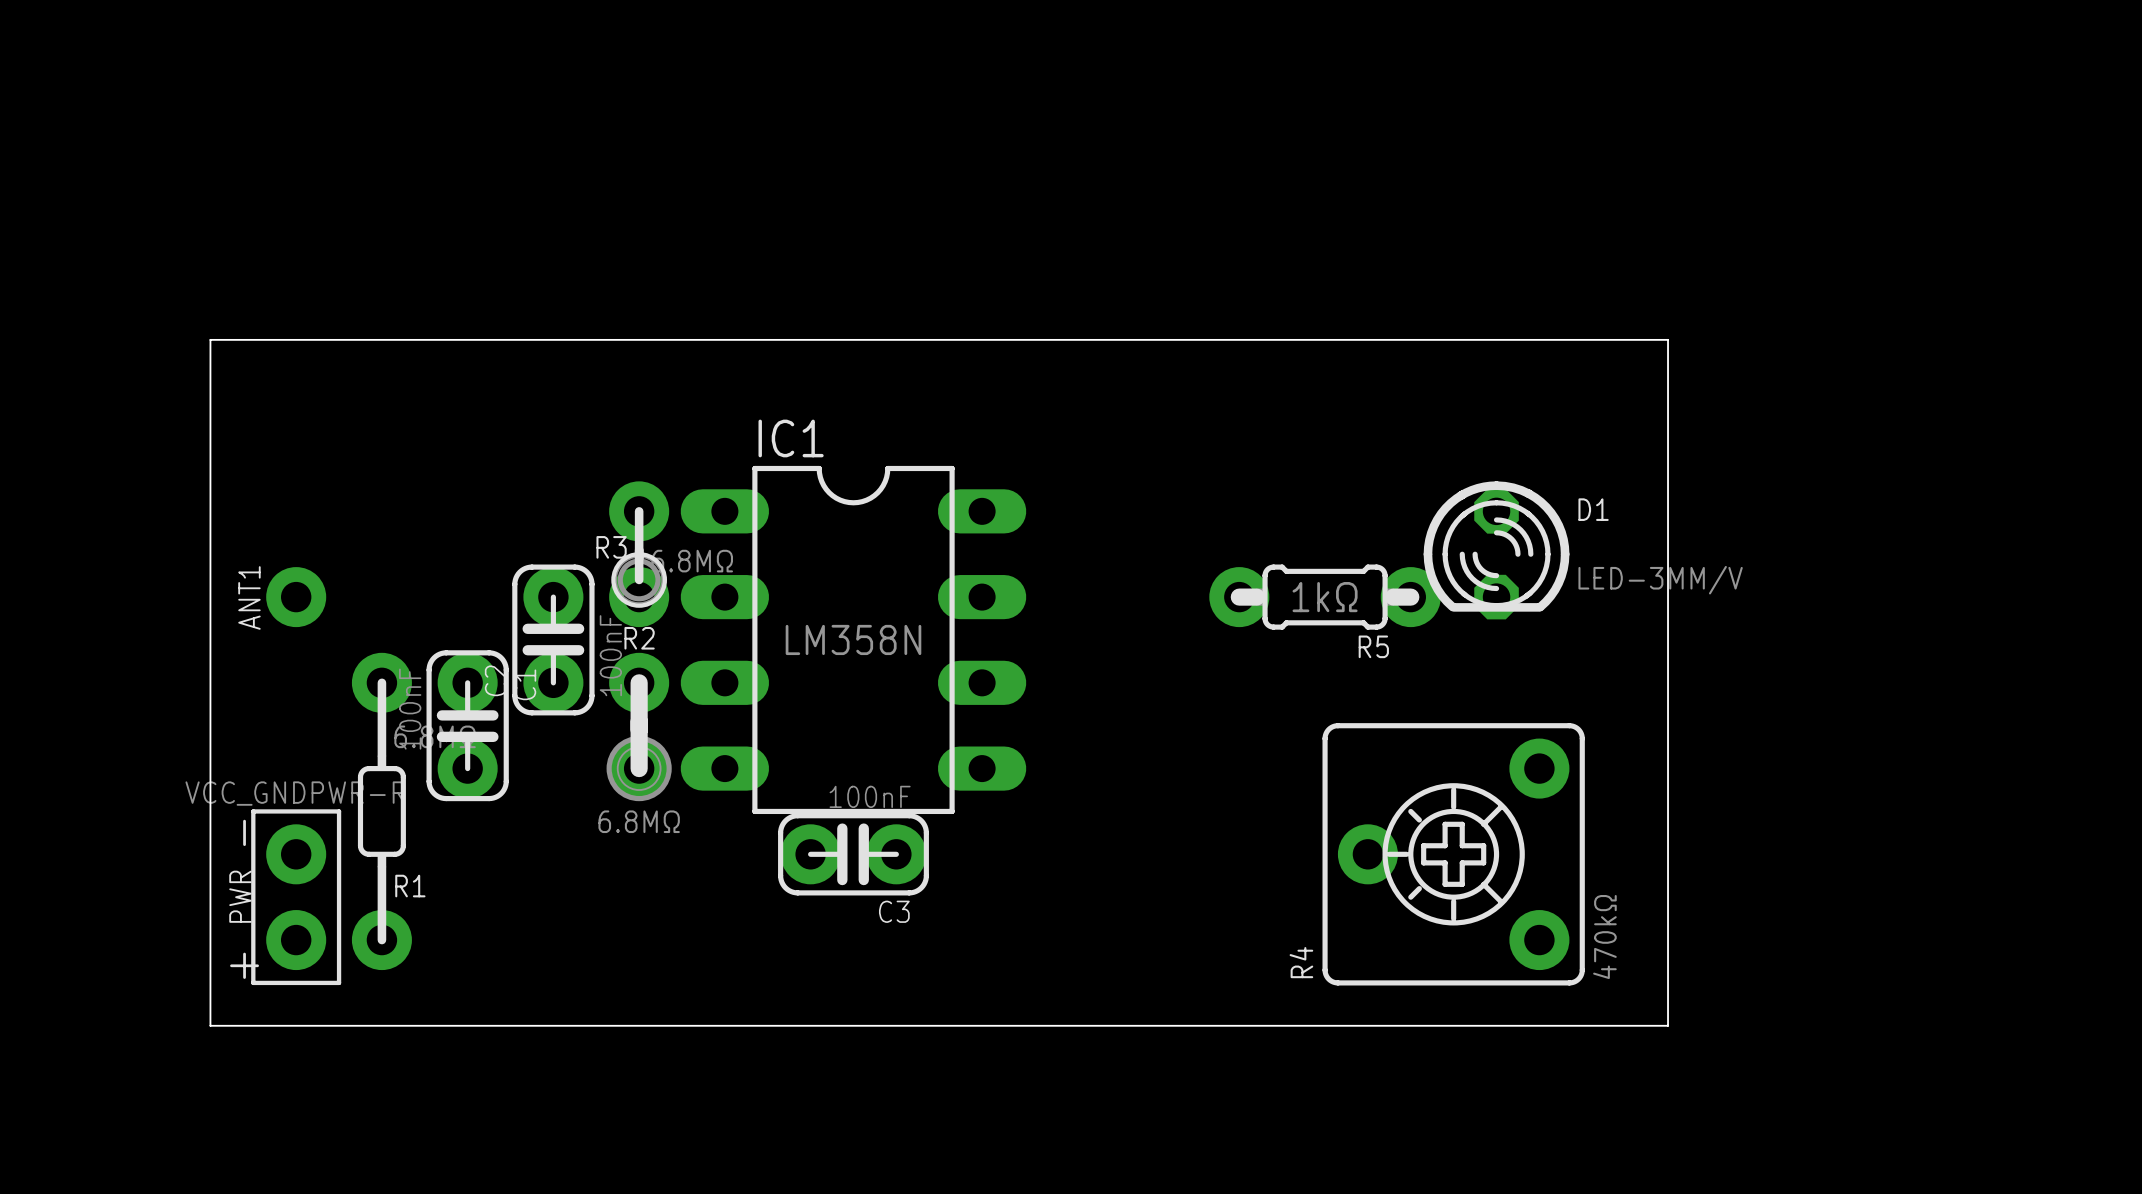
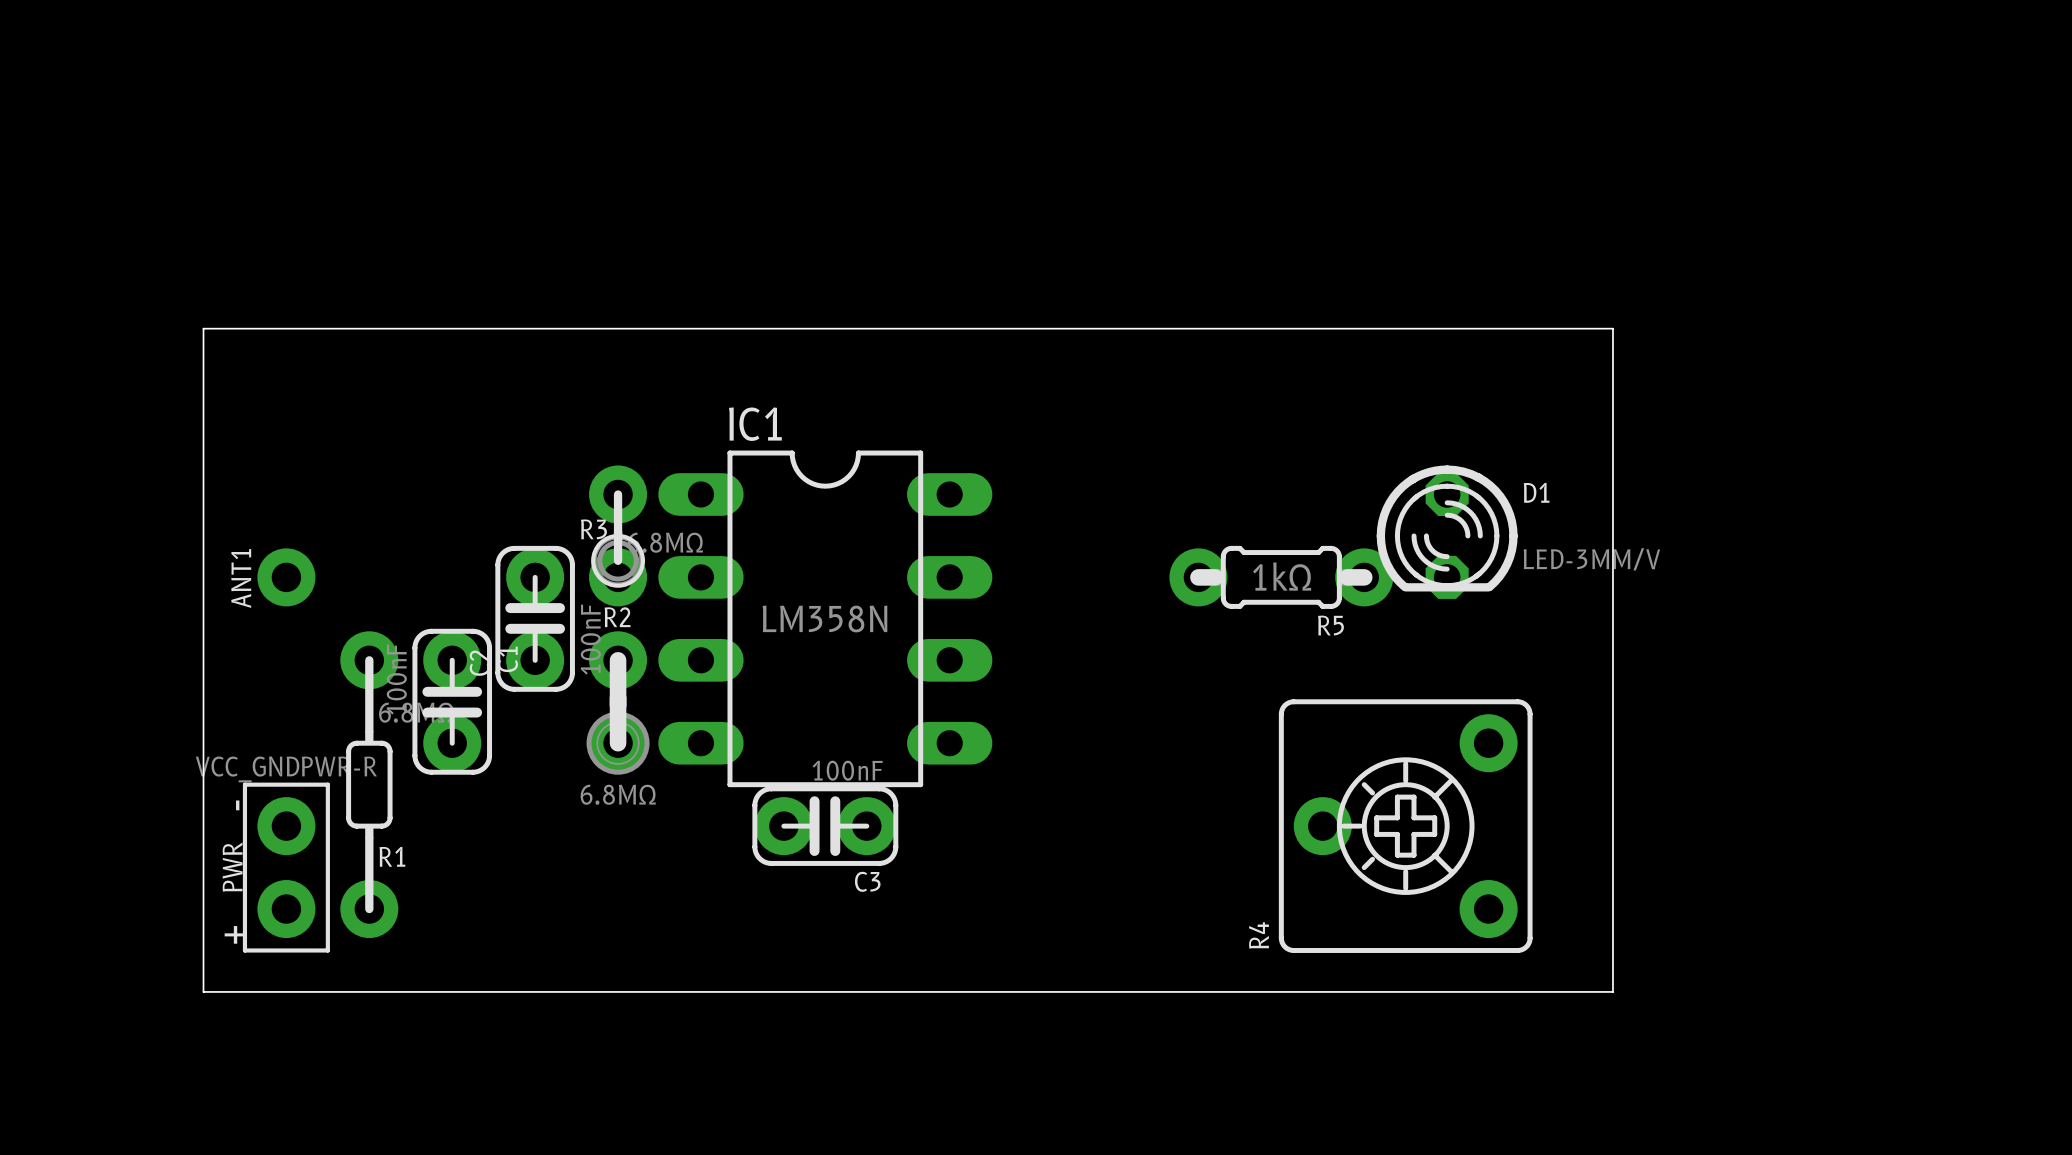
R4 value: 470kΩ (1604, 937) -> none

